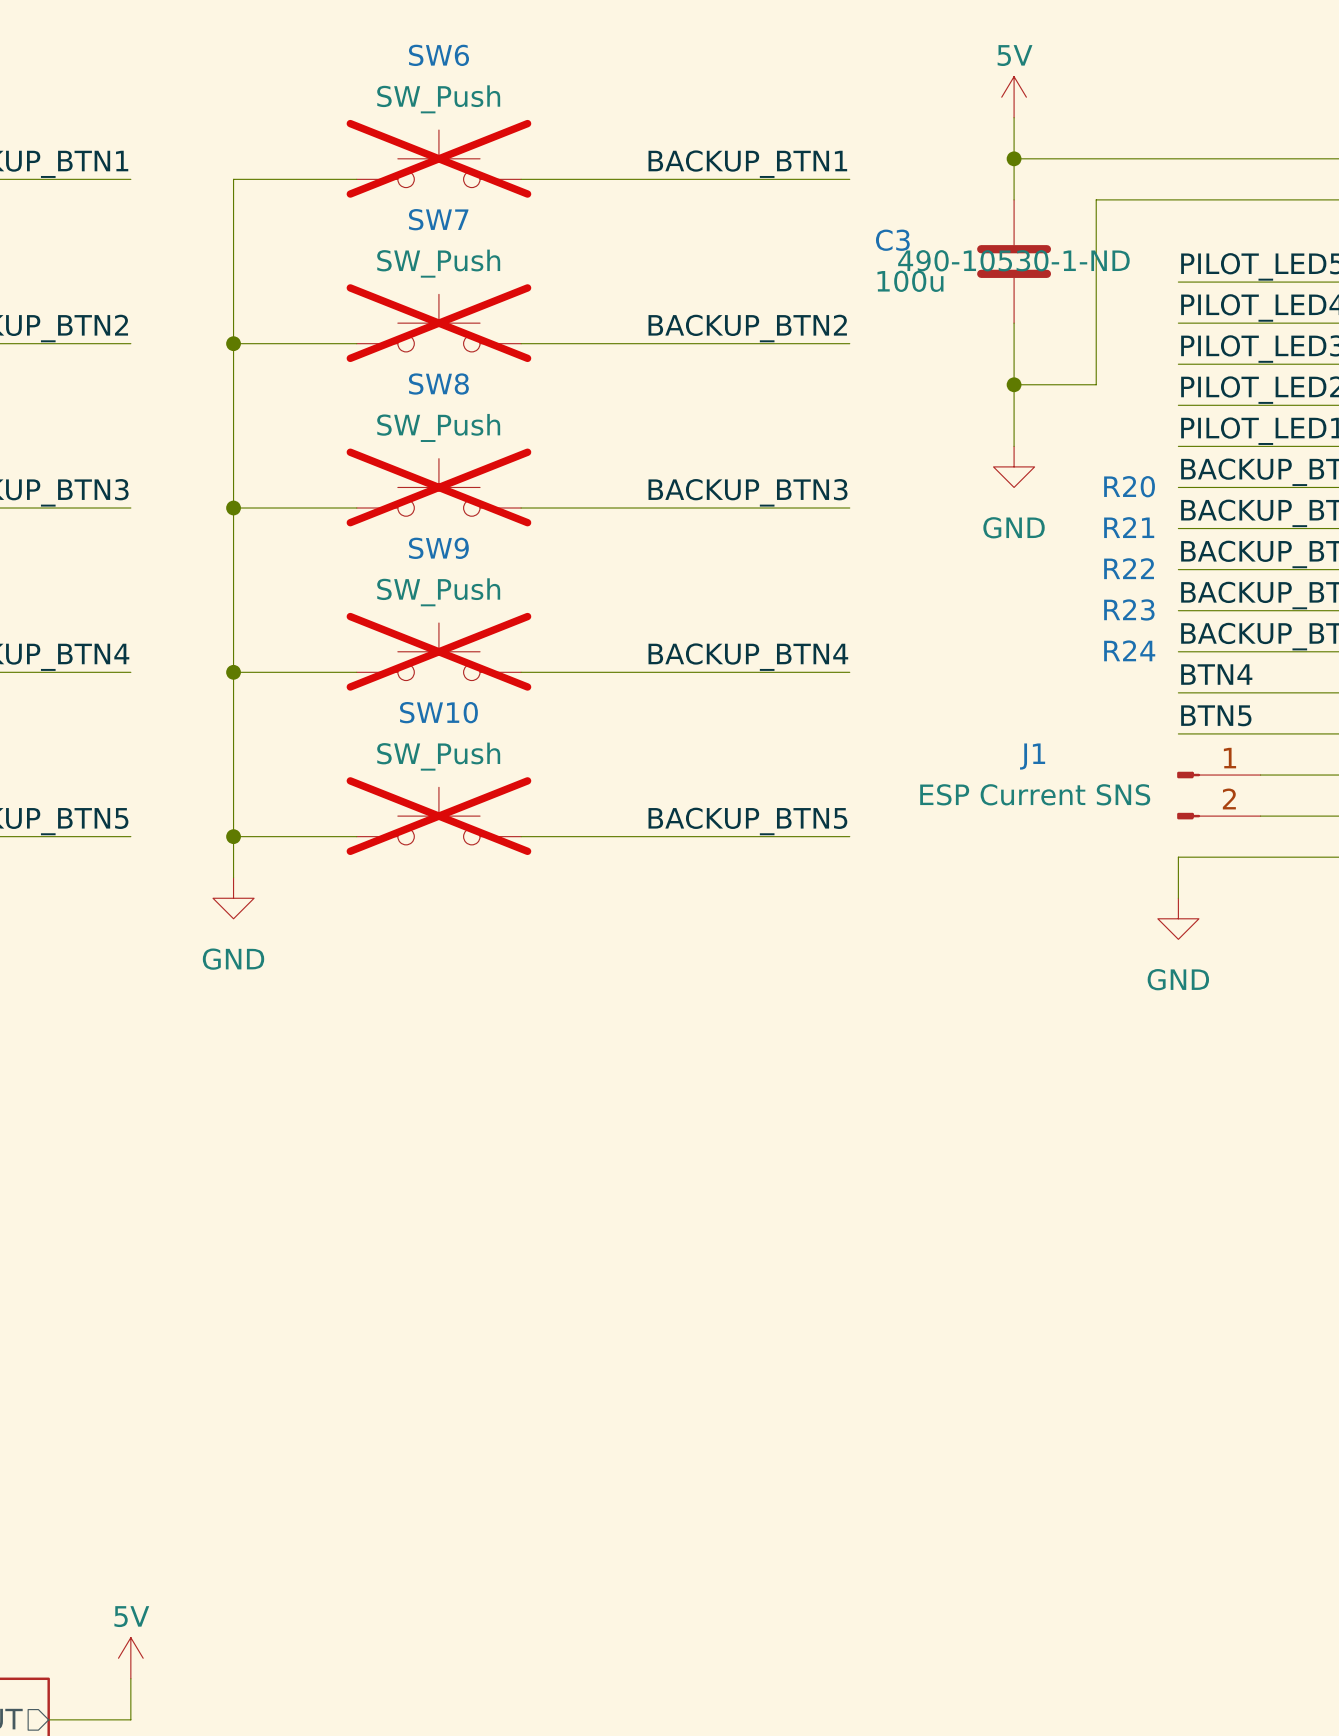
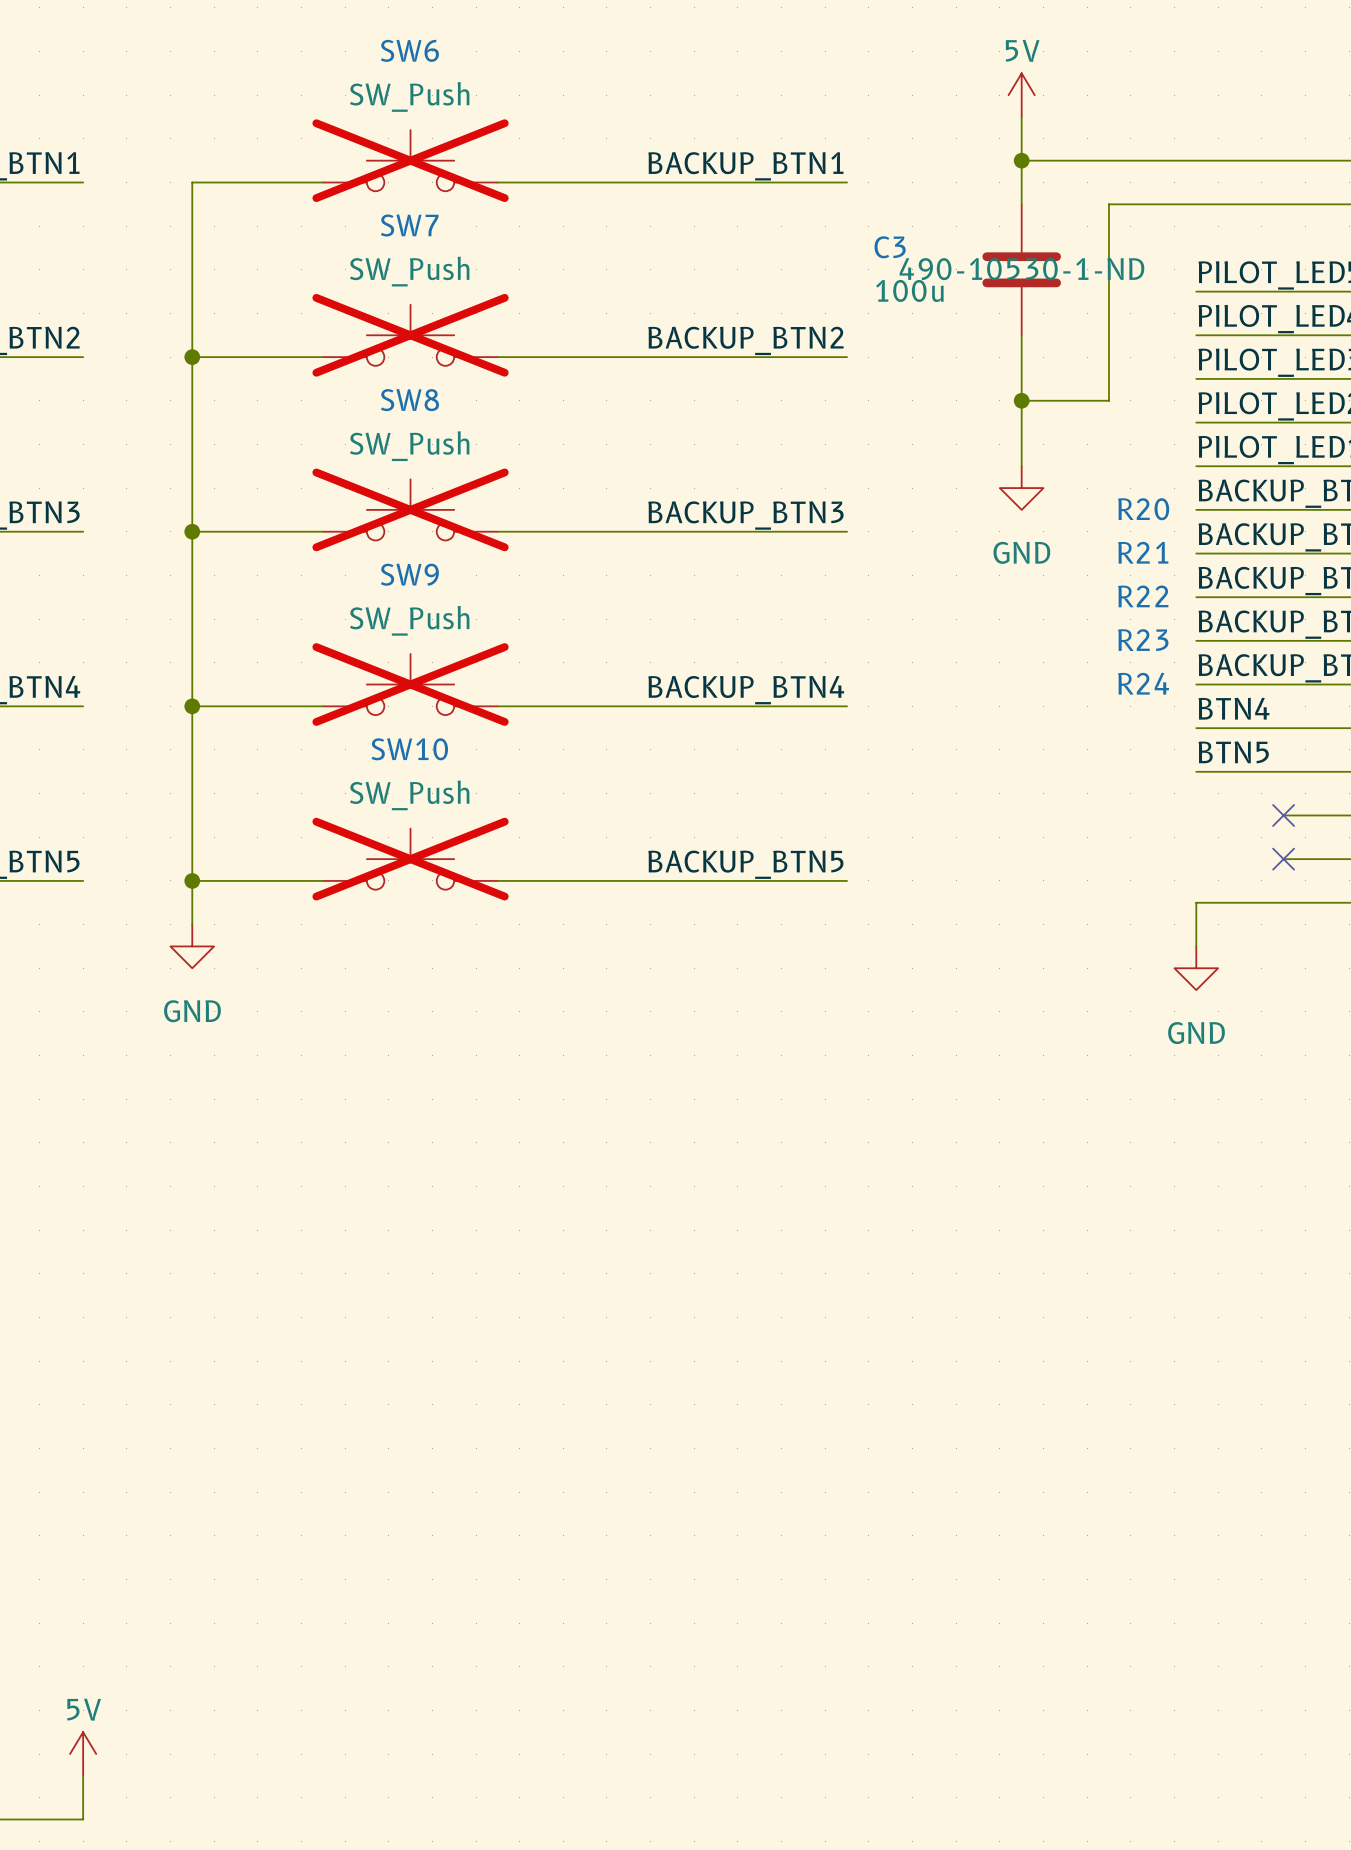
no-connect mark: none -> (1283, 815)
J1: ESP Current SNS (1218, 795) -> none
no-connect mark: none -> (1283, 859)

